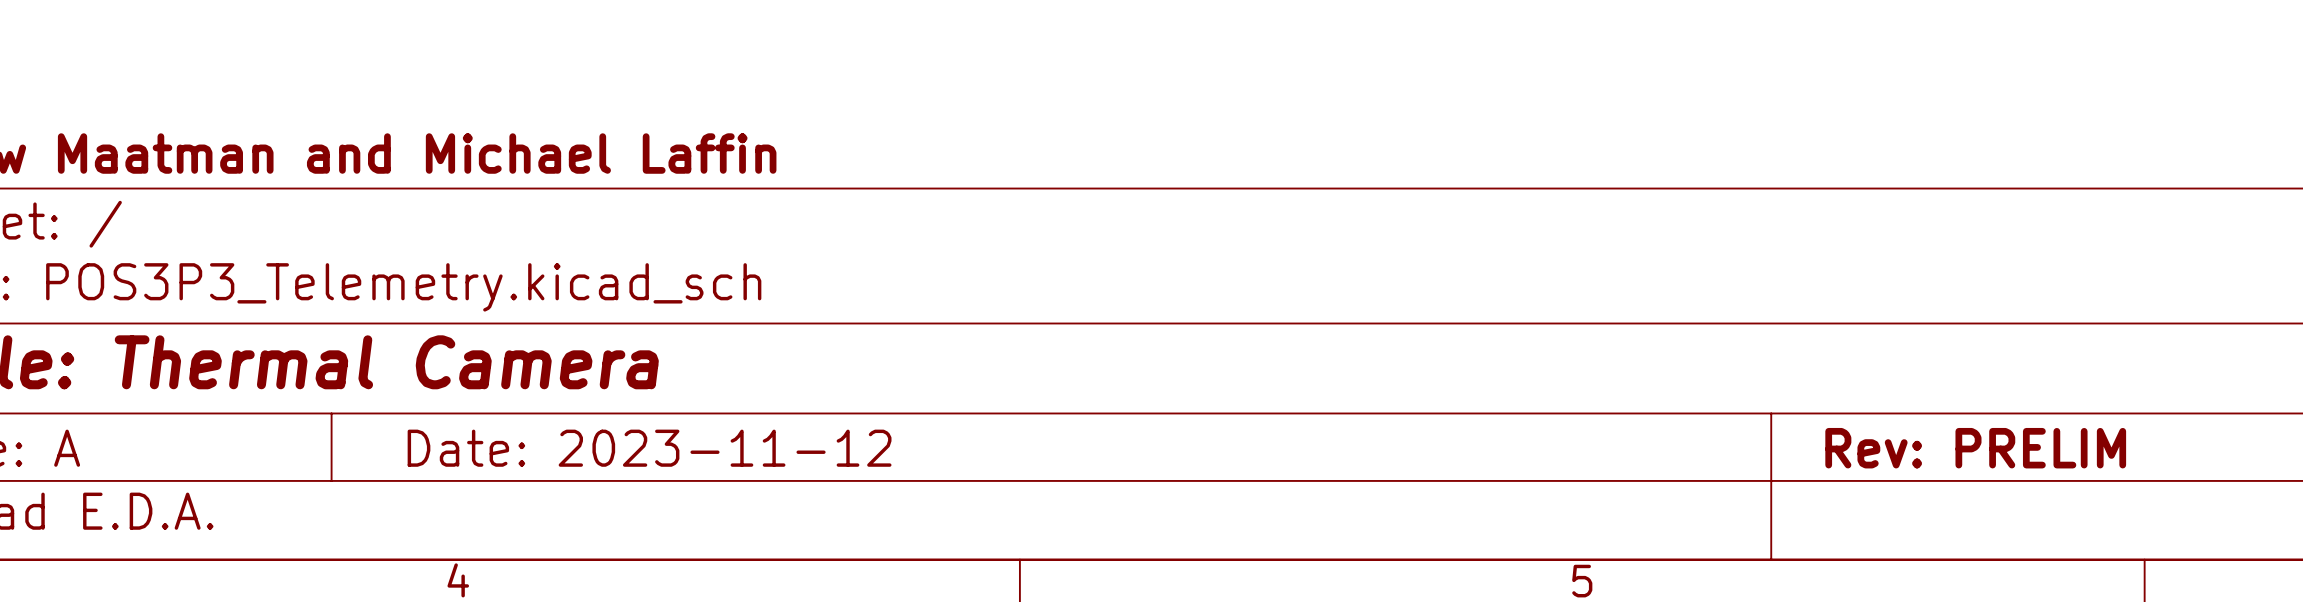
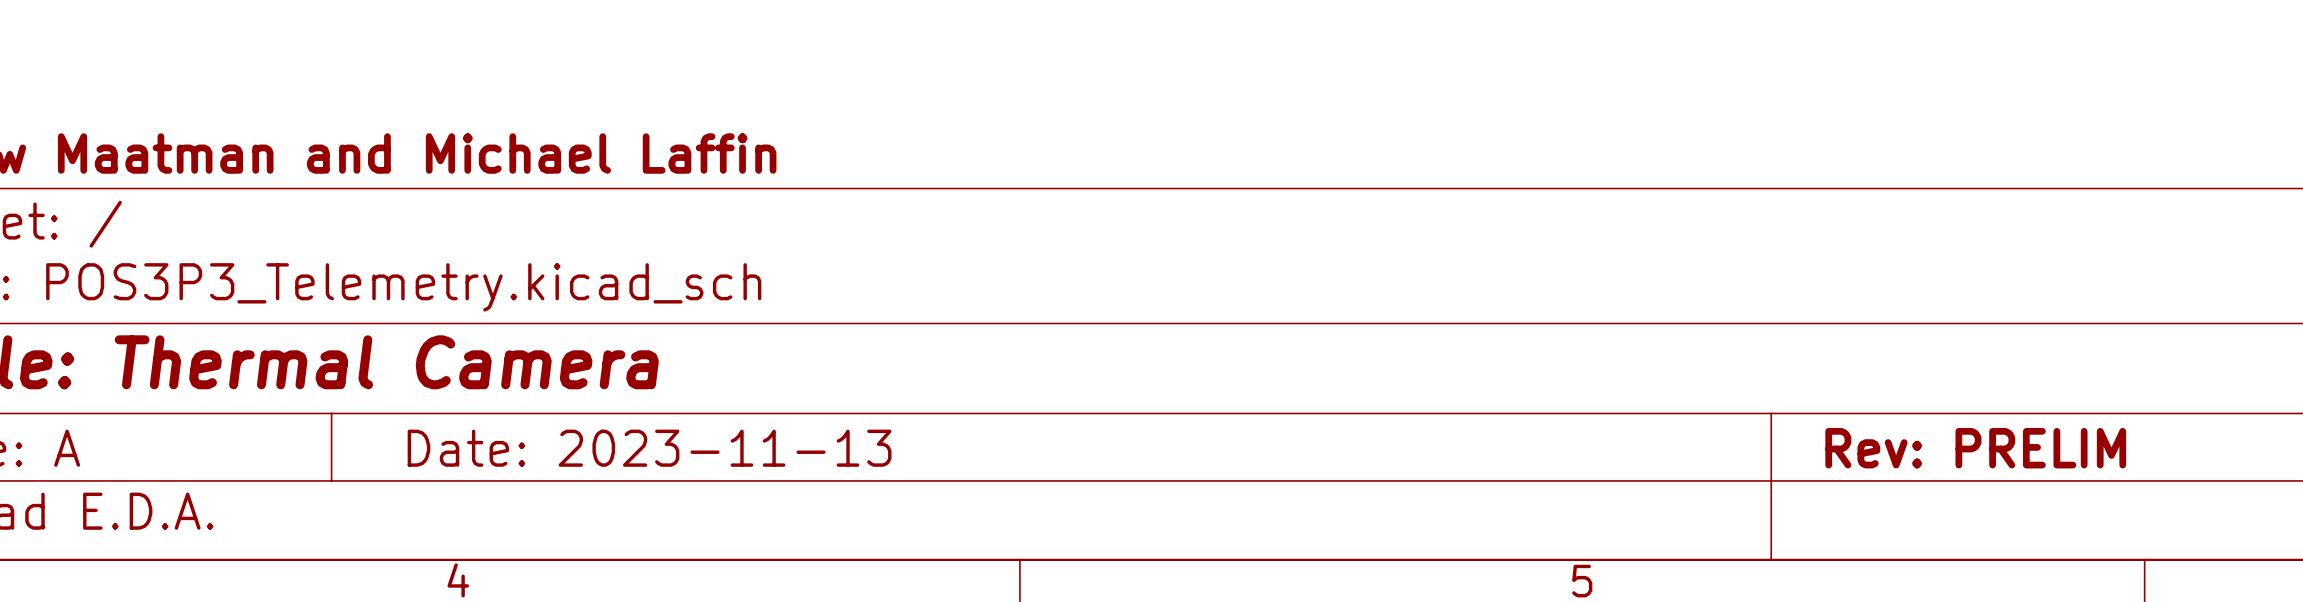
title block: Date: 2023-11-12 (649, 448) -> Date: 2023-11-13 (649, 448)

